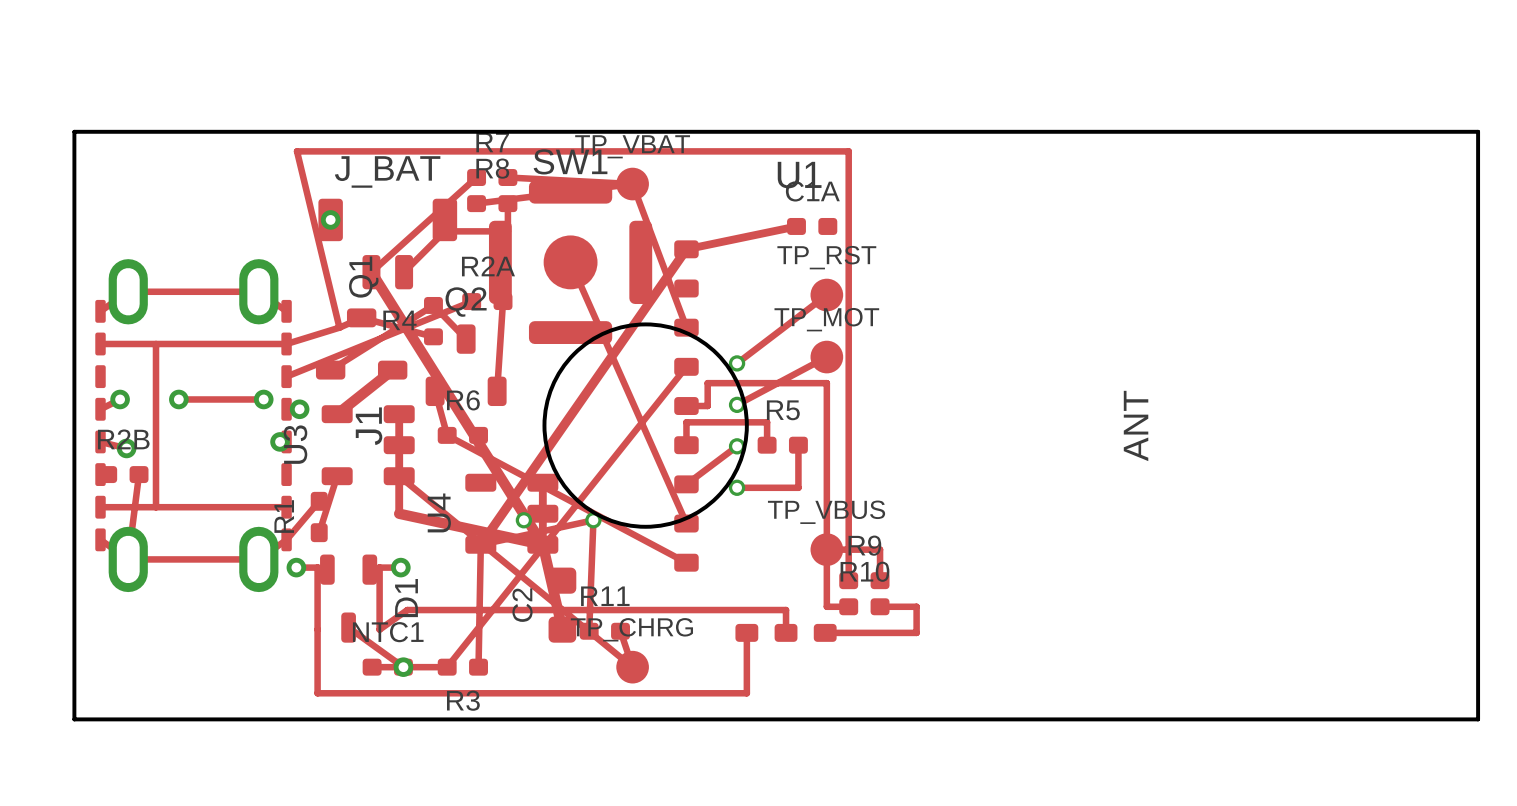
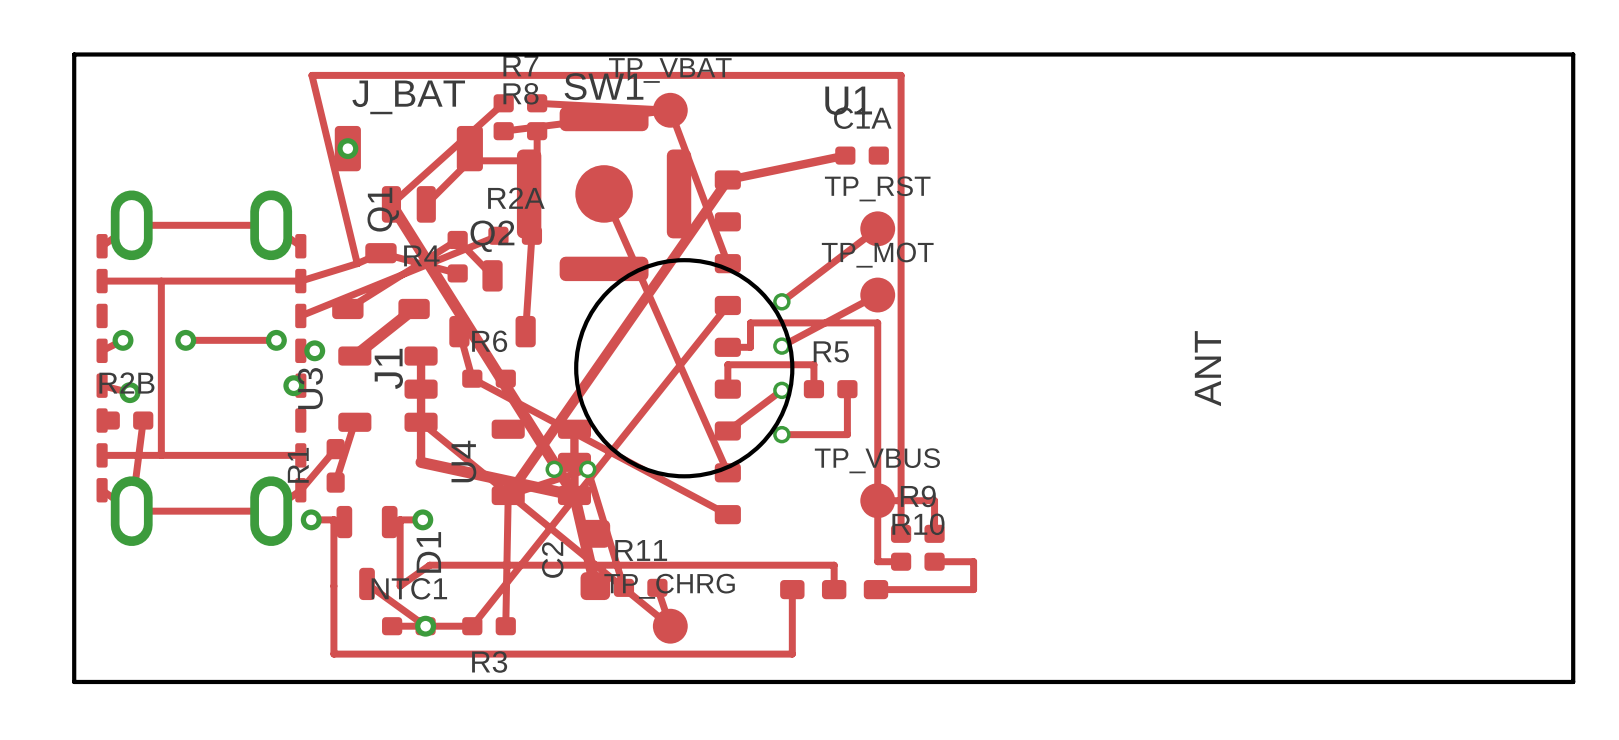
via position: (593, 520) -> (587, 469)
track: (480, 544) (593, 520) (589, 631) -> (508, 495) (587, 469) (623, 587)

